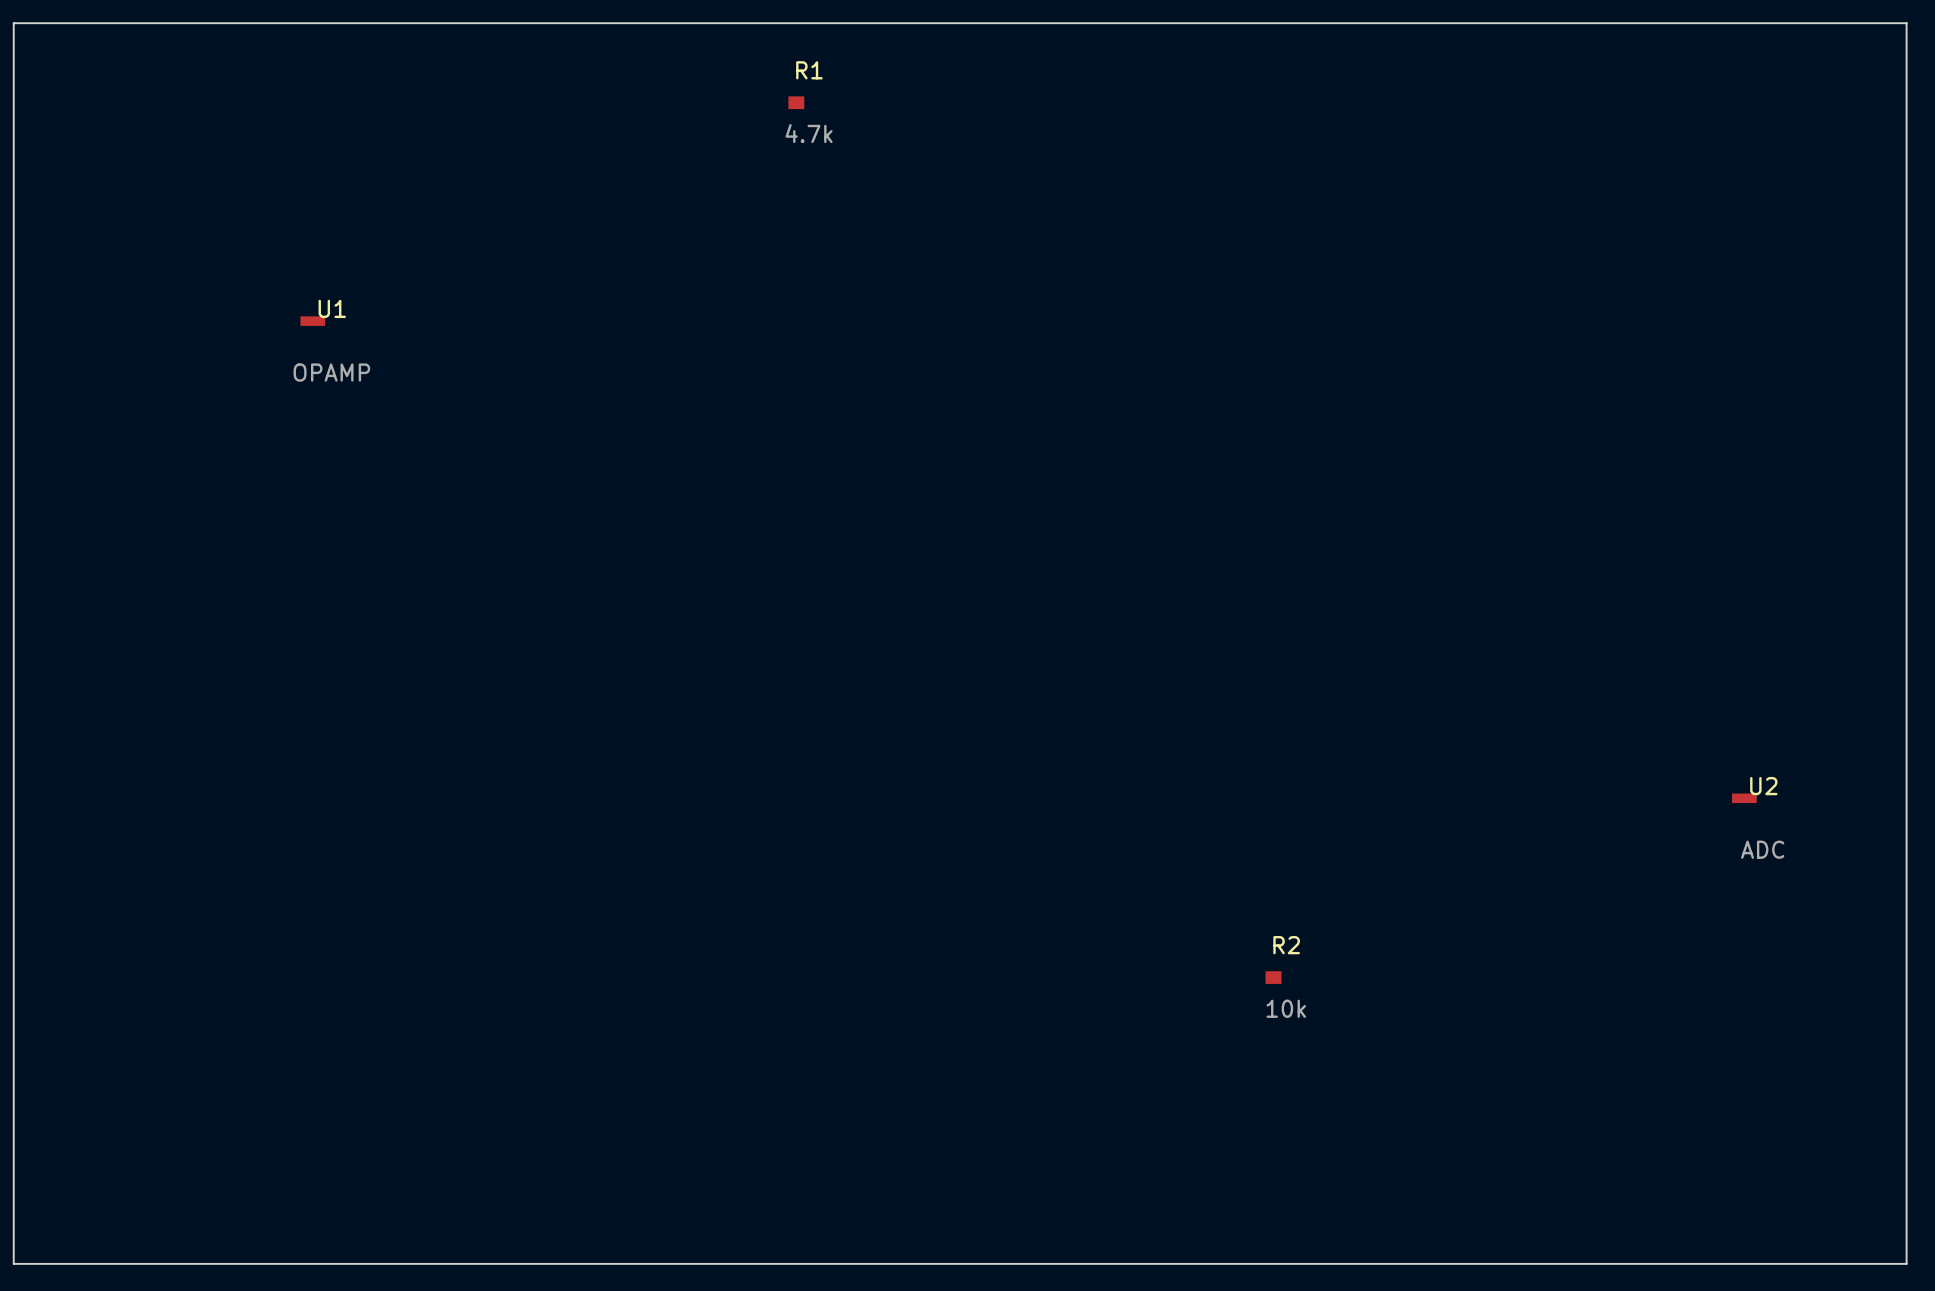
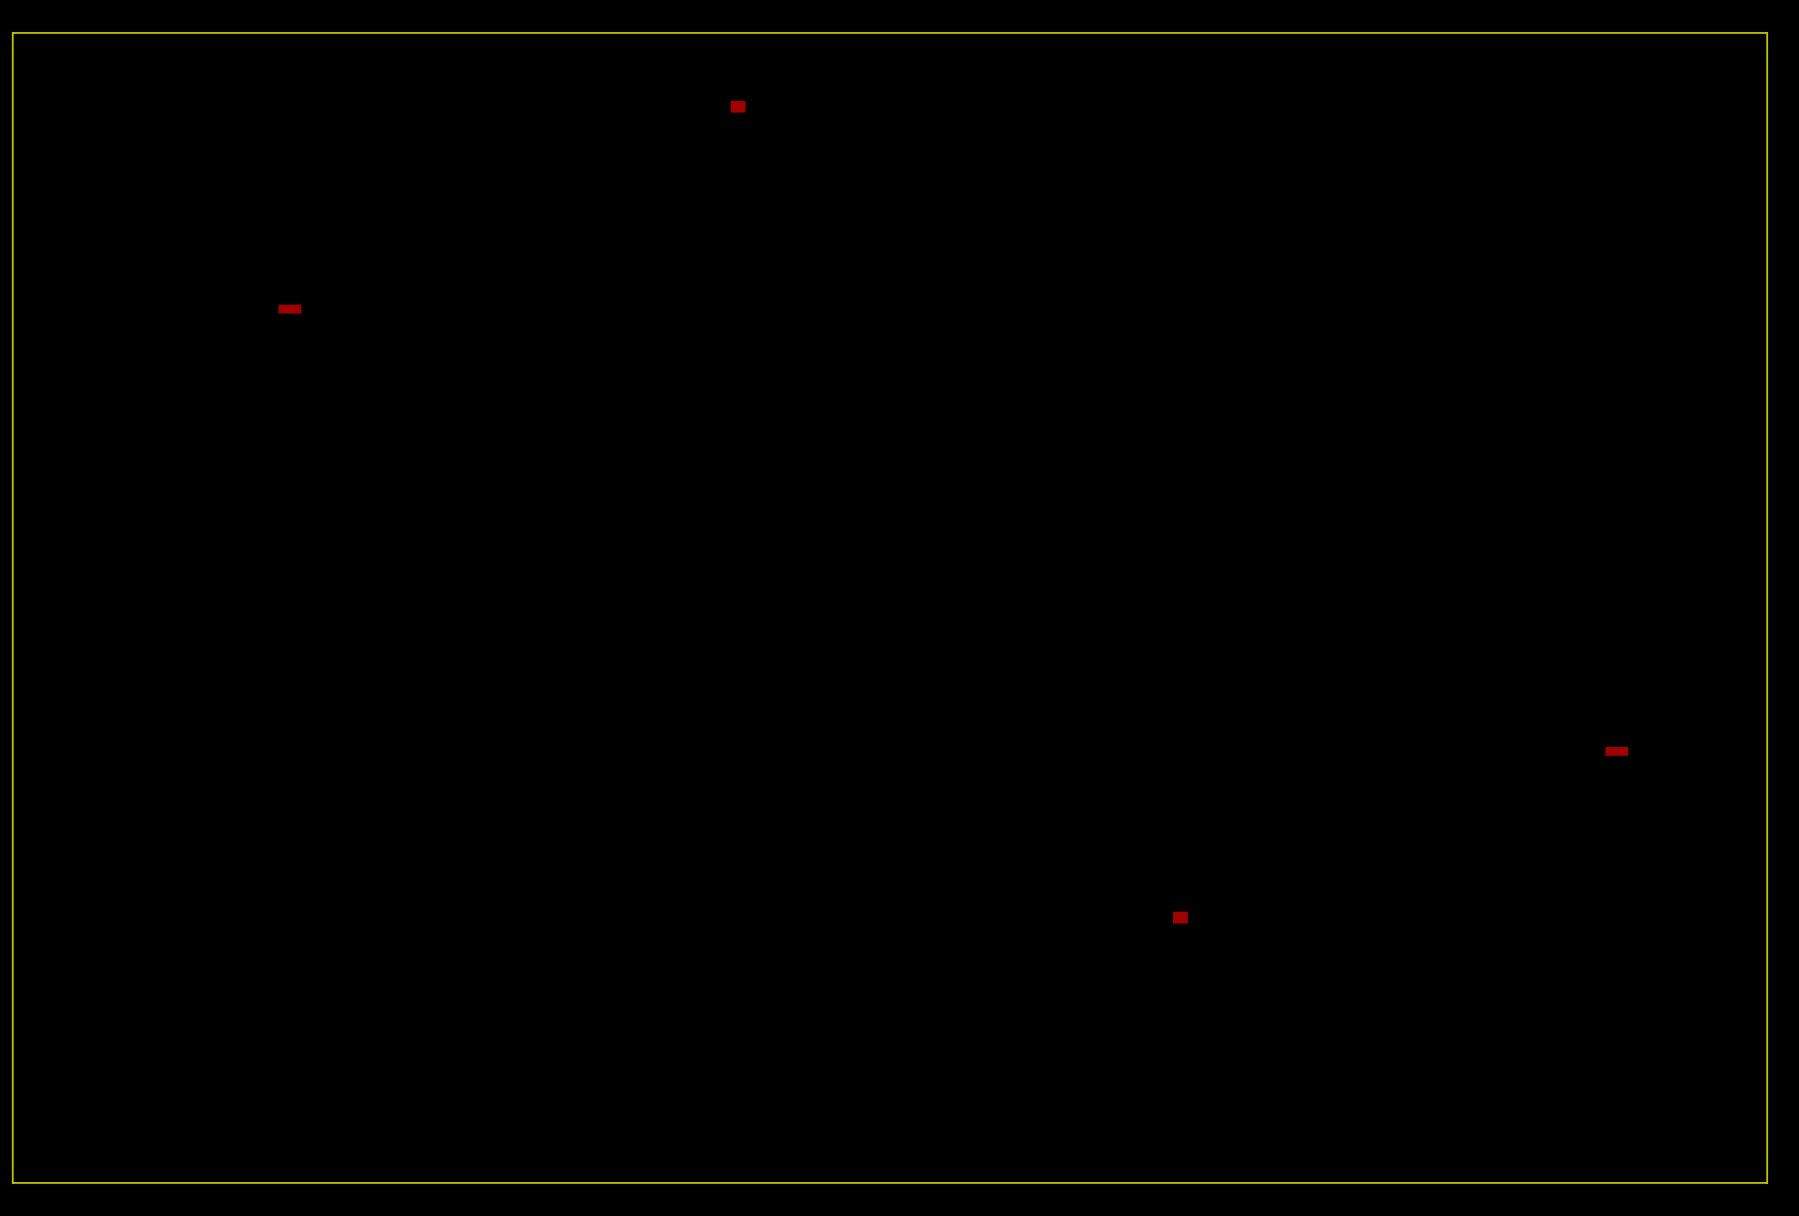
R1 name: R1 (809, 70) -> none
R1 value: 4.7k (809, 133) -> none
U1 name: U1 (332, 308) -> none
U1 value: OPAMP (331, 372) -> none
U2 name: U2 (1763, 786) -> none
U2 value: ADC (1762, 849) -> none
R2 name: R2 (1286, 945) -> none
R2 value: 10k (1286, 1008) -> none

